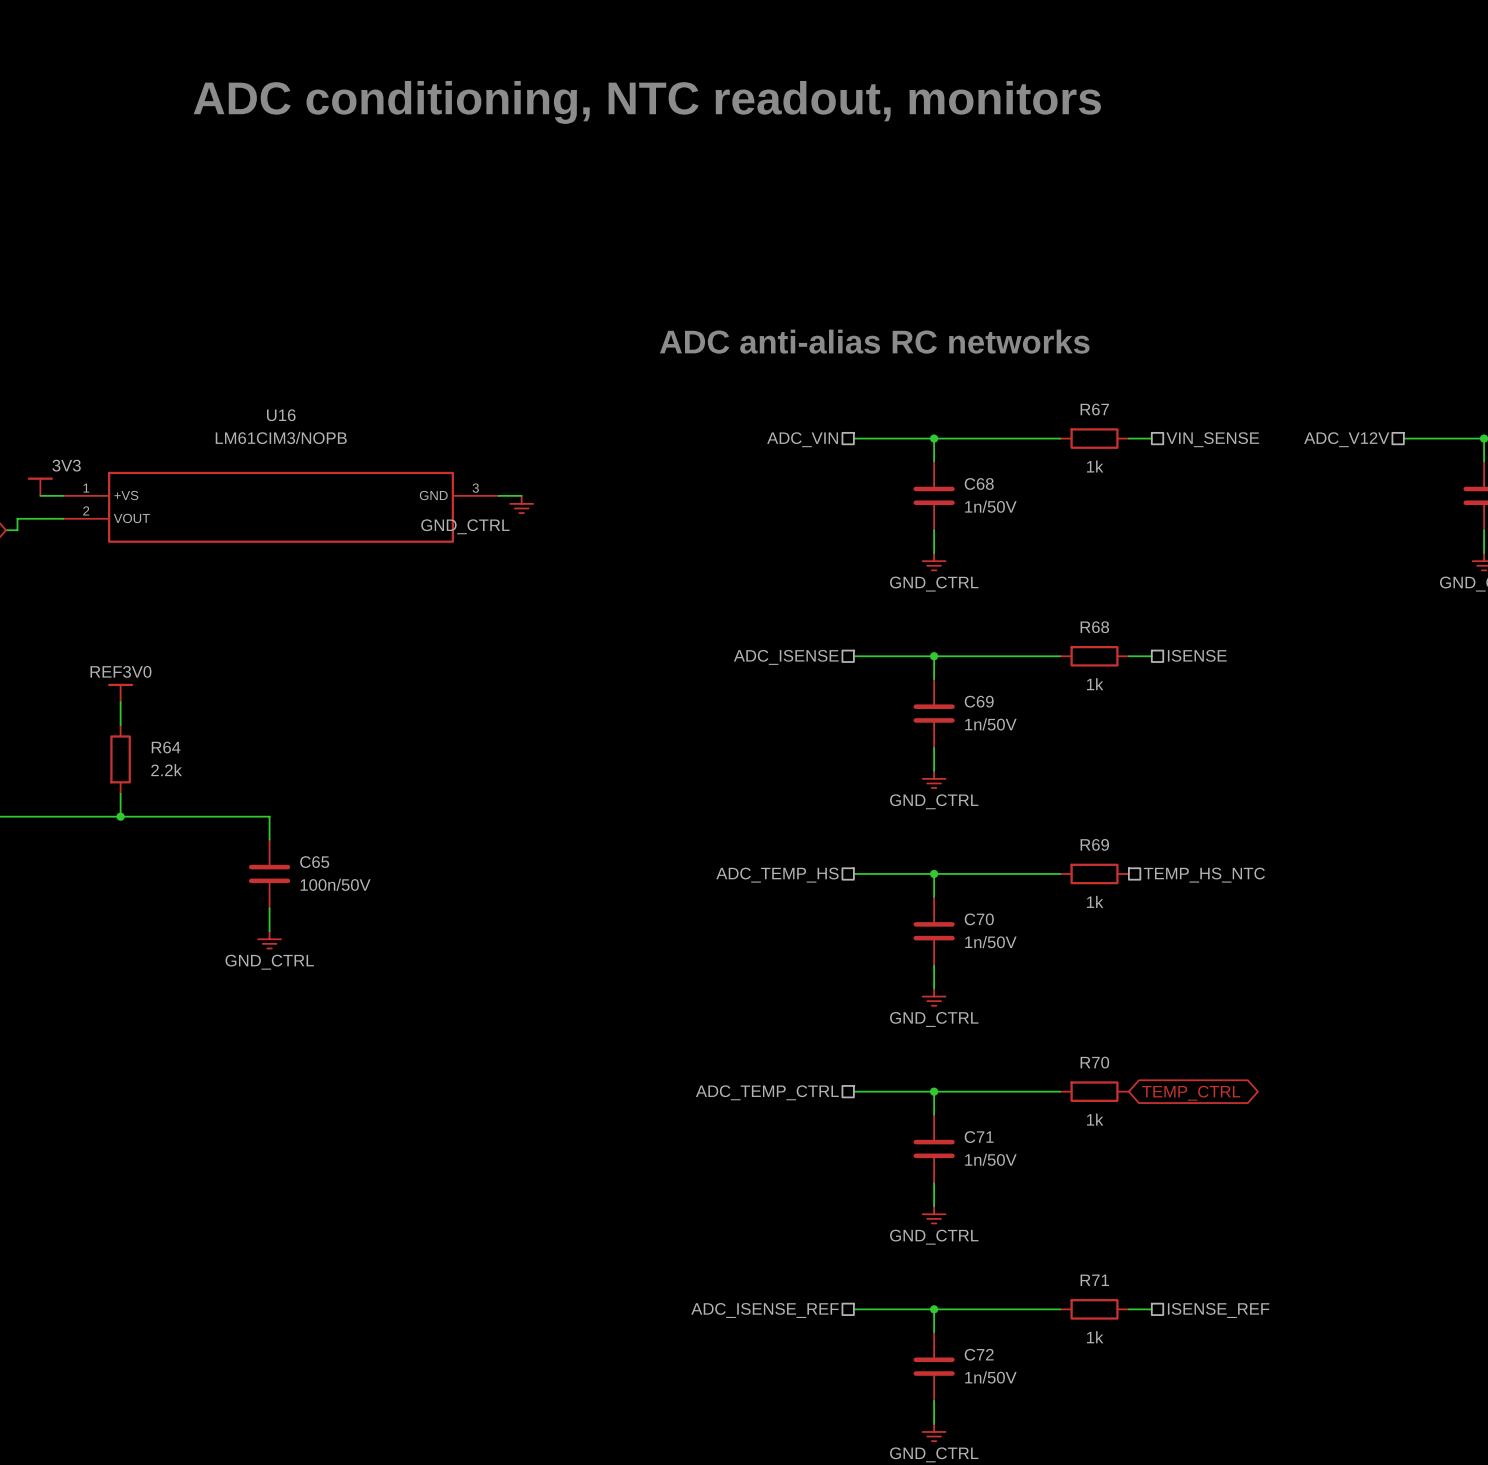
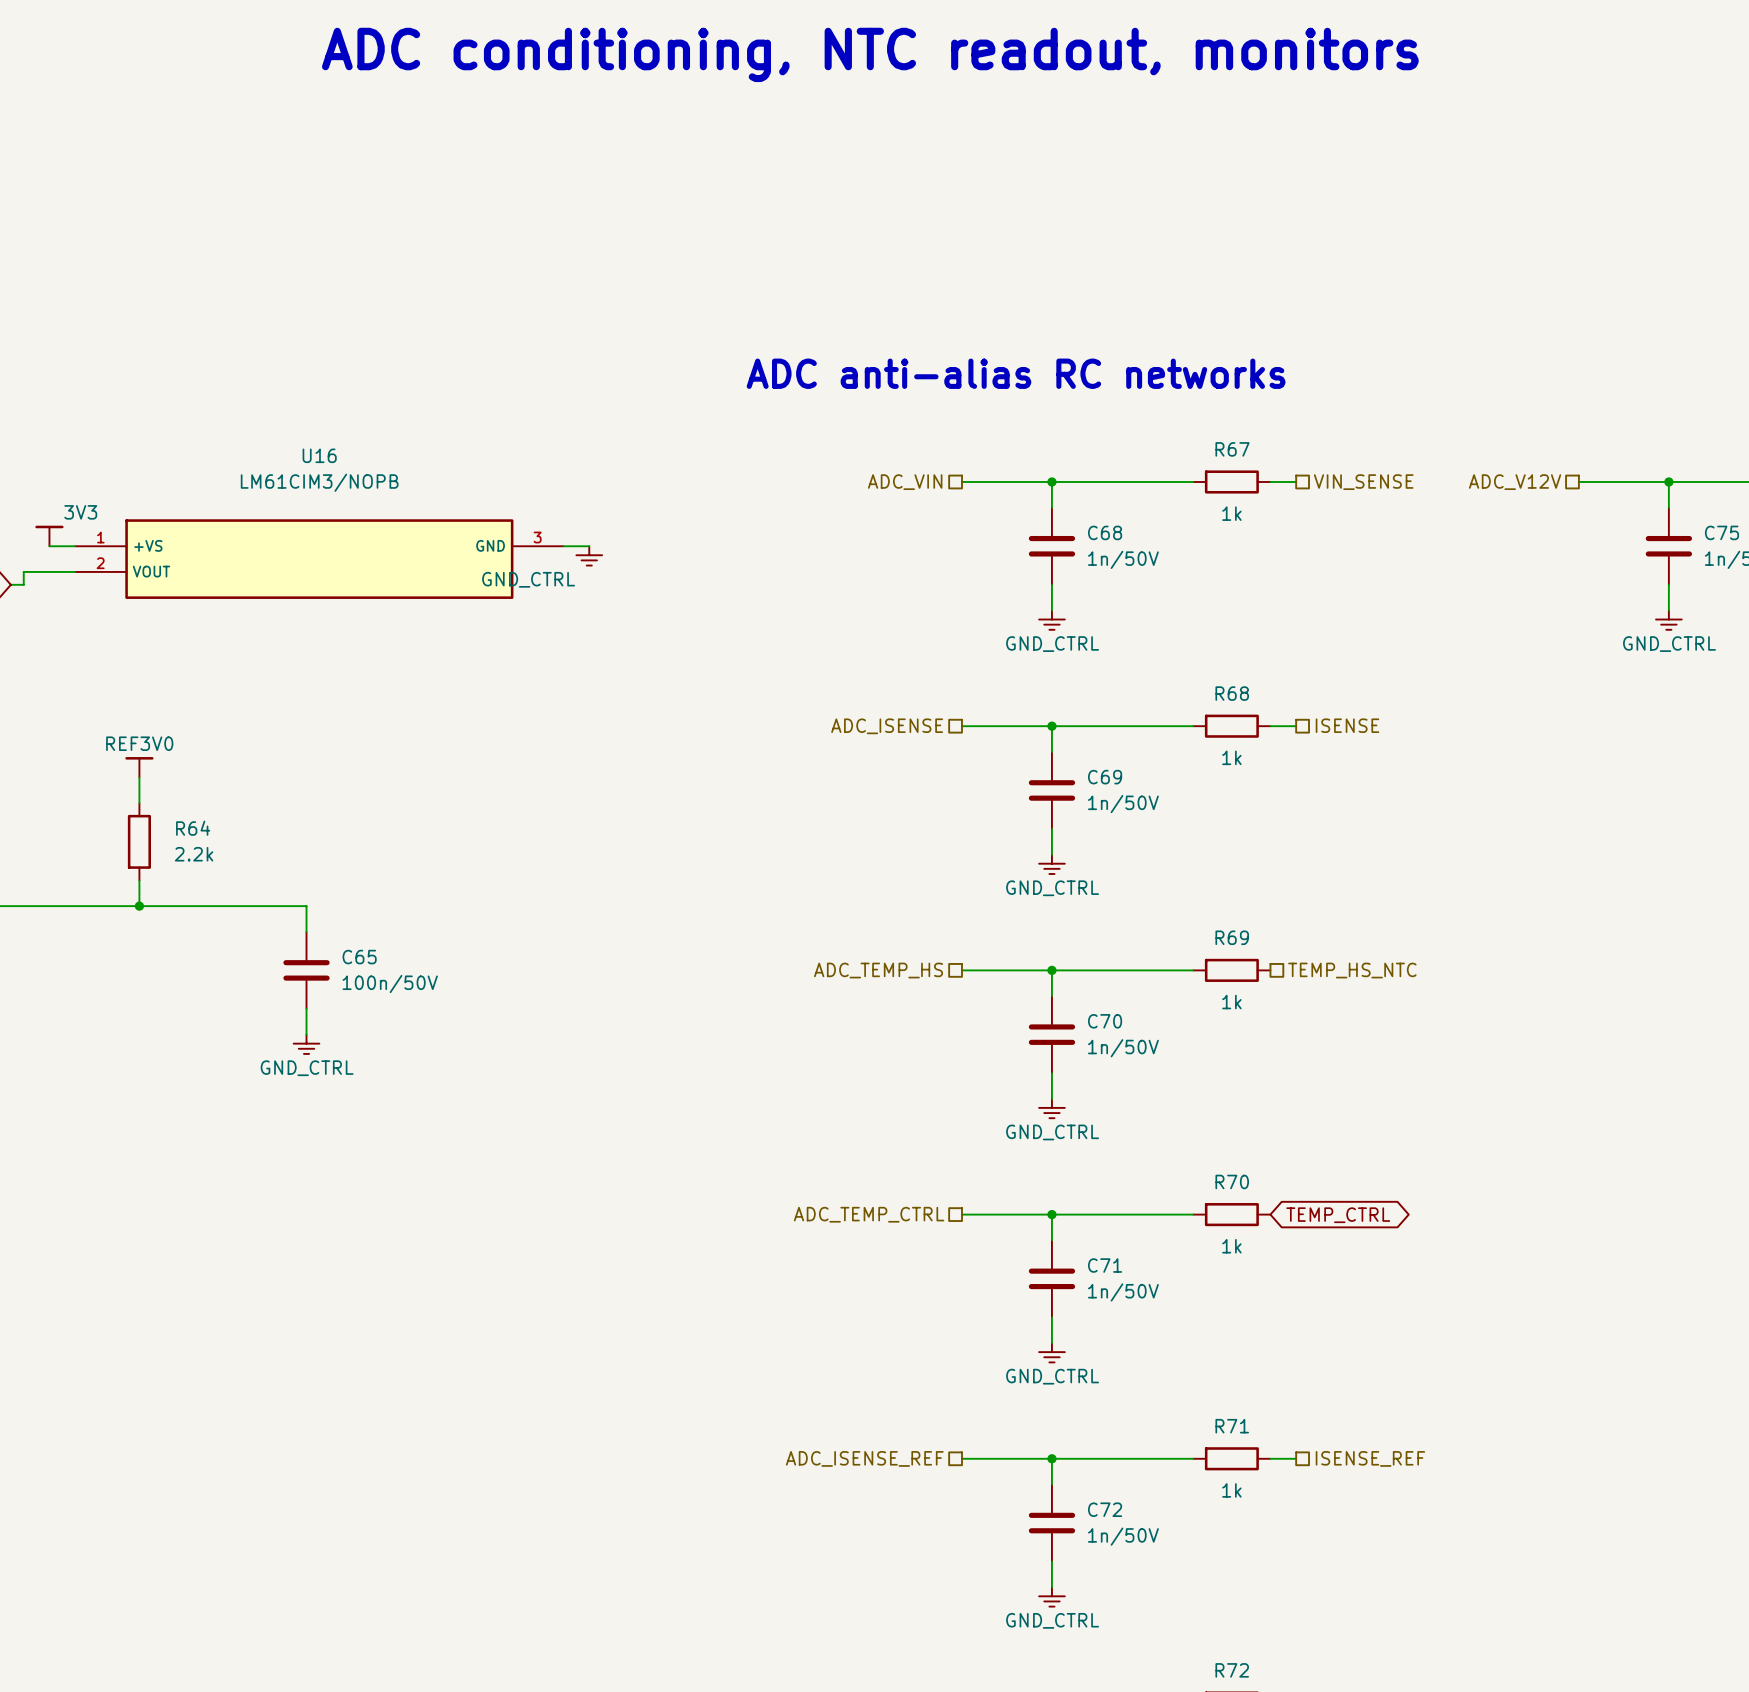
text position: ADC conditioning, NTC readout, monitors (647, 102) -> ADC conditioning, NTC readout, monitors (870, 54)

